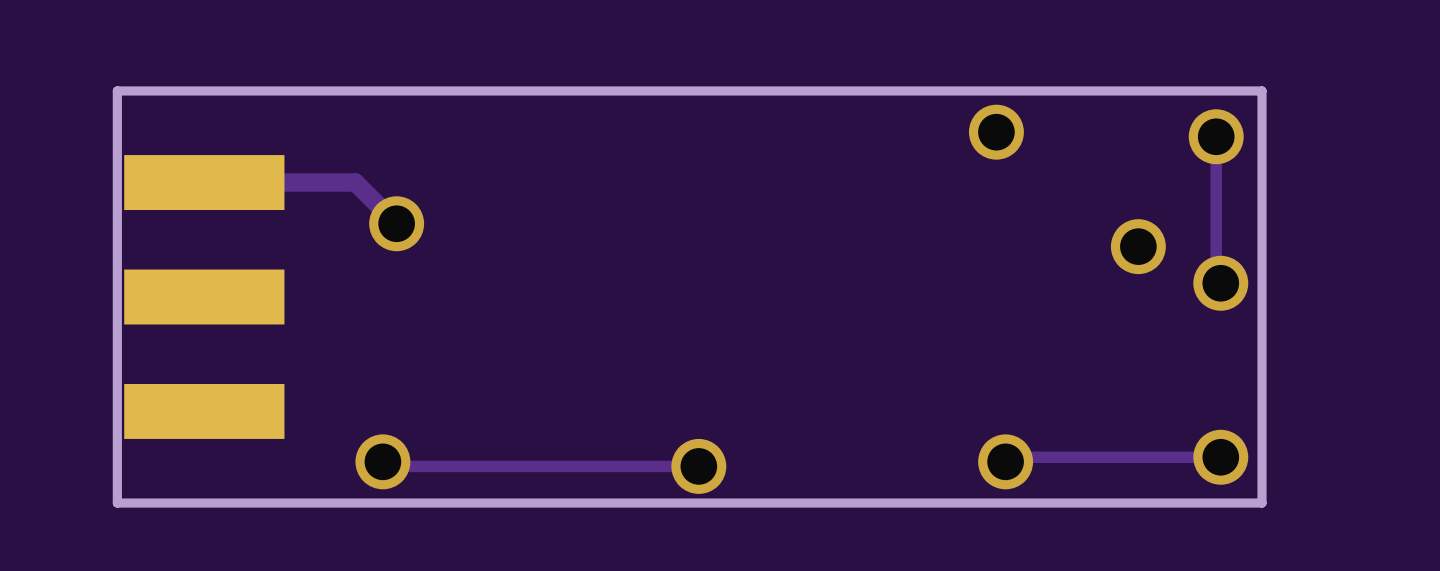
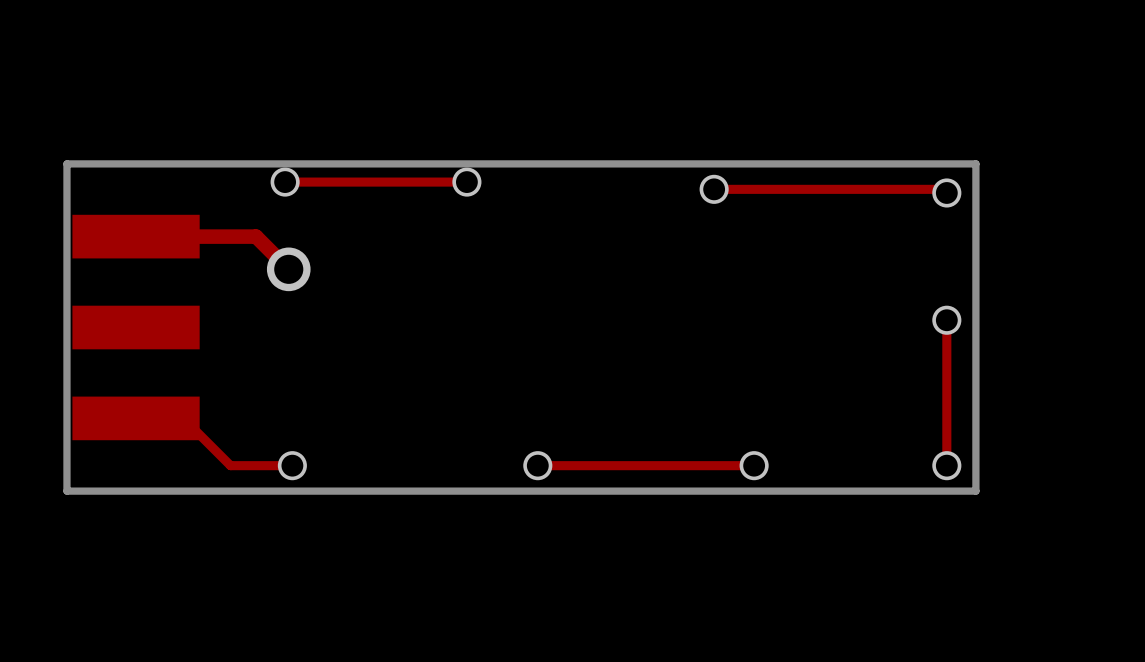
via size: [1188, 109, 1244, 165] -> [932, 178, 962, 208]
track: none -> (285, 182) (466, 182)
via: none -> (285, 182)
via: none -> (466, 182)
track: none -> (714, 189) (943, 189) (946, 192)
via: none -> (714, 189)
via: (996, 132) -> none
track: (1216, 136) (1216, 278) (1220, 283) -> none
via: (1138, 246) -> none
via size: [1193, 255, 1249, 311] -> [932, 305, 962, 335]
track: none -> (946, 320) (946, 465)
track: none -> (136, 418) (183, 418) (230, 465) (292, 465)
via size: [1193, 429, 1249, 485] -> [932, 451, 962, 481]
via size: [355, 434, 411, 490] -> [277, 451, 307, 481]
via size: [978, 434, 1034, 490] -> [739, 451, 769, 481]
via size: [671, 438, 727, 494] -> [523, 451, 553, 481]
track: (1220, 457) (1010, 457) (1005, 461) -> none
track: (382, 461) (387, 466) (698, 466) -> none
track: none -> (537, 465) (754, 465)

